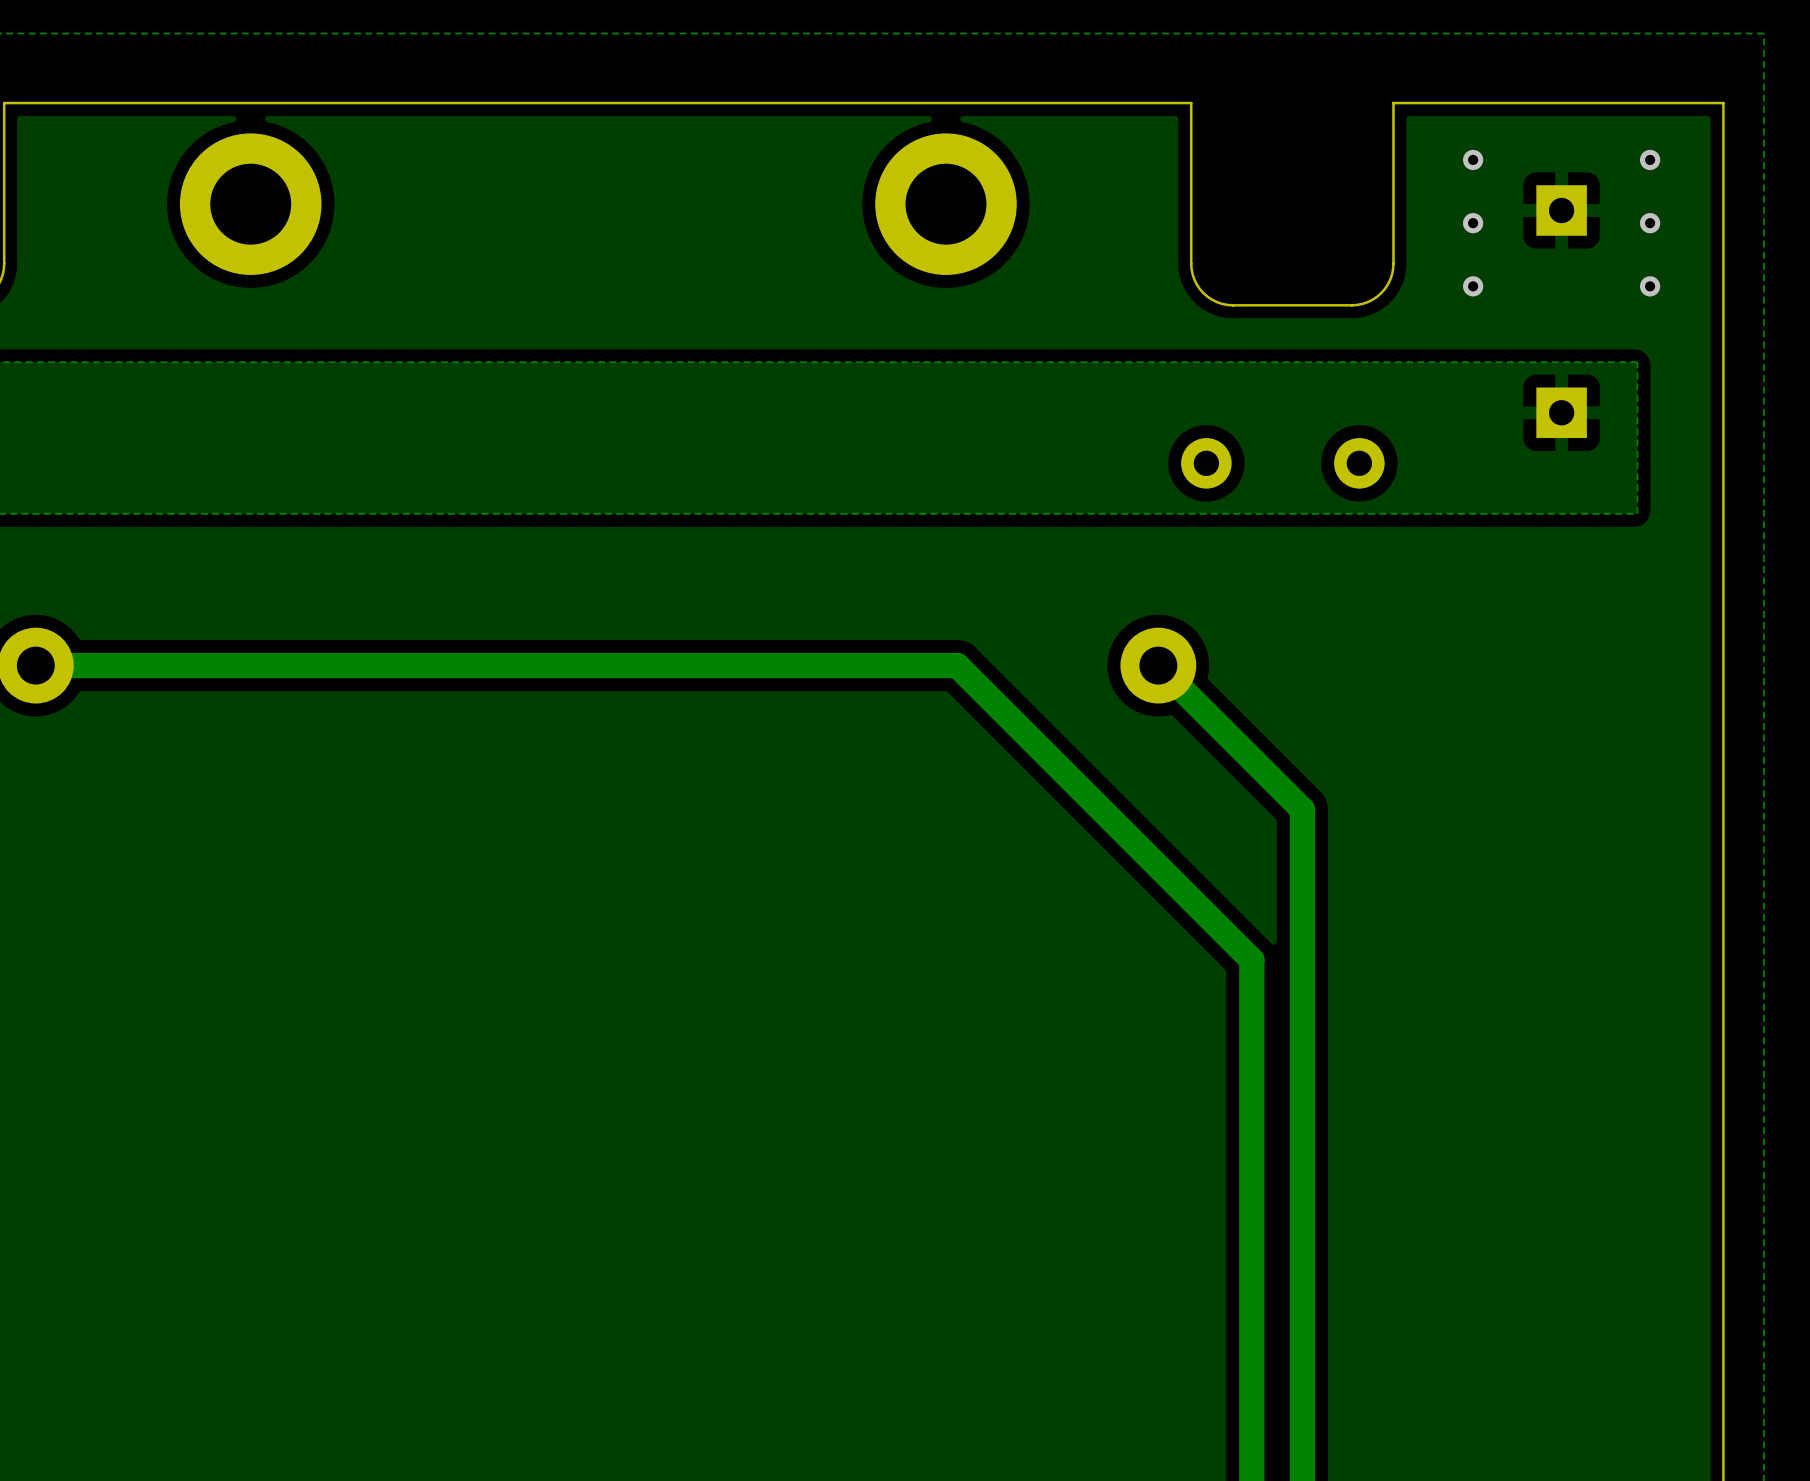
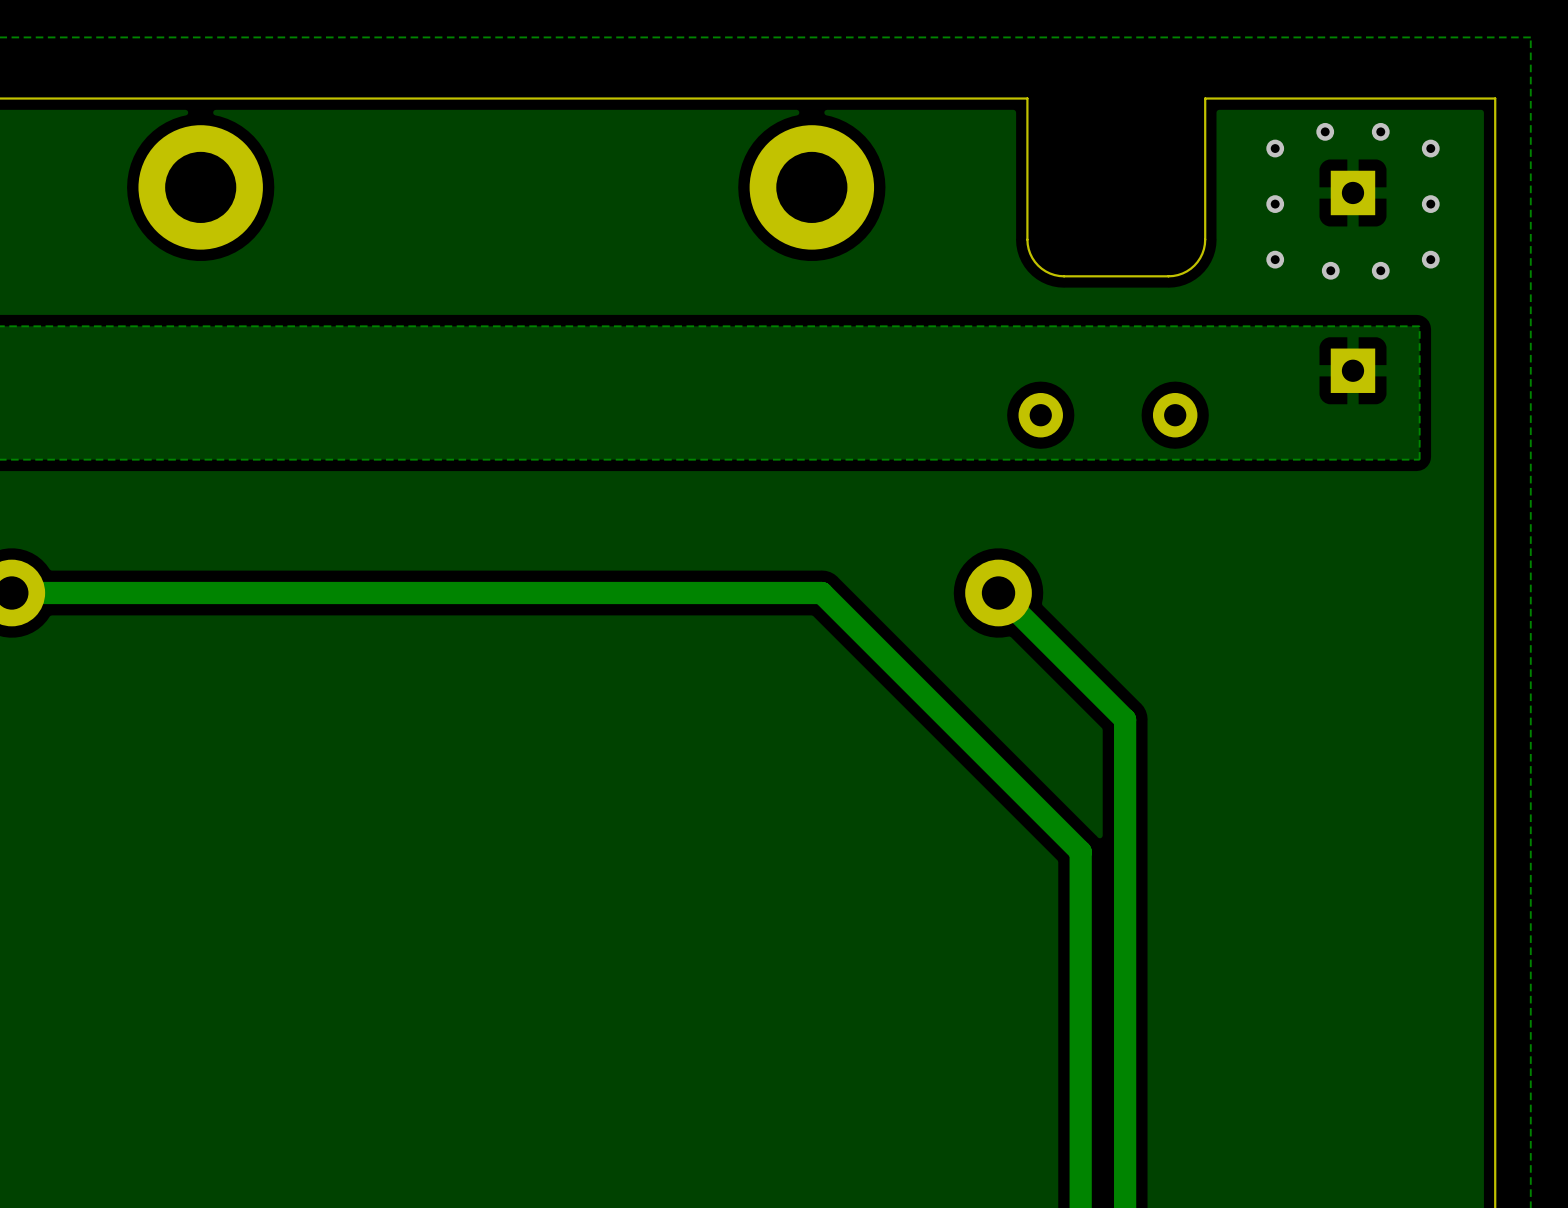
via: none -> (1325, 131)
via: none -> (1380, 131)
via: none -> (1330, 270)
via: none -> (1380, 270)

